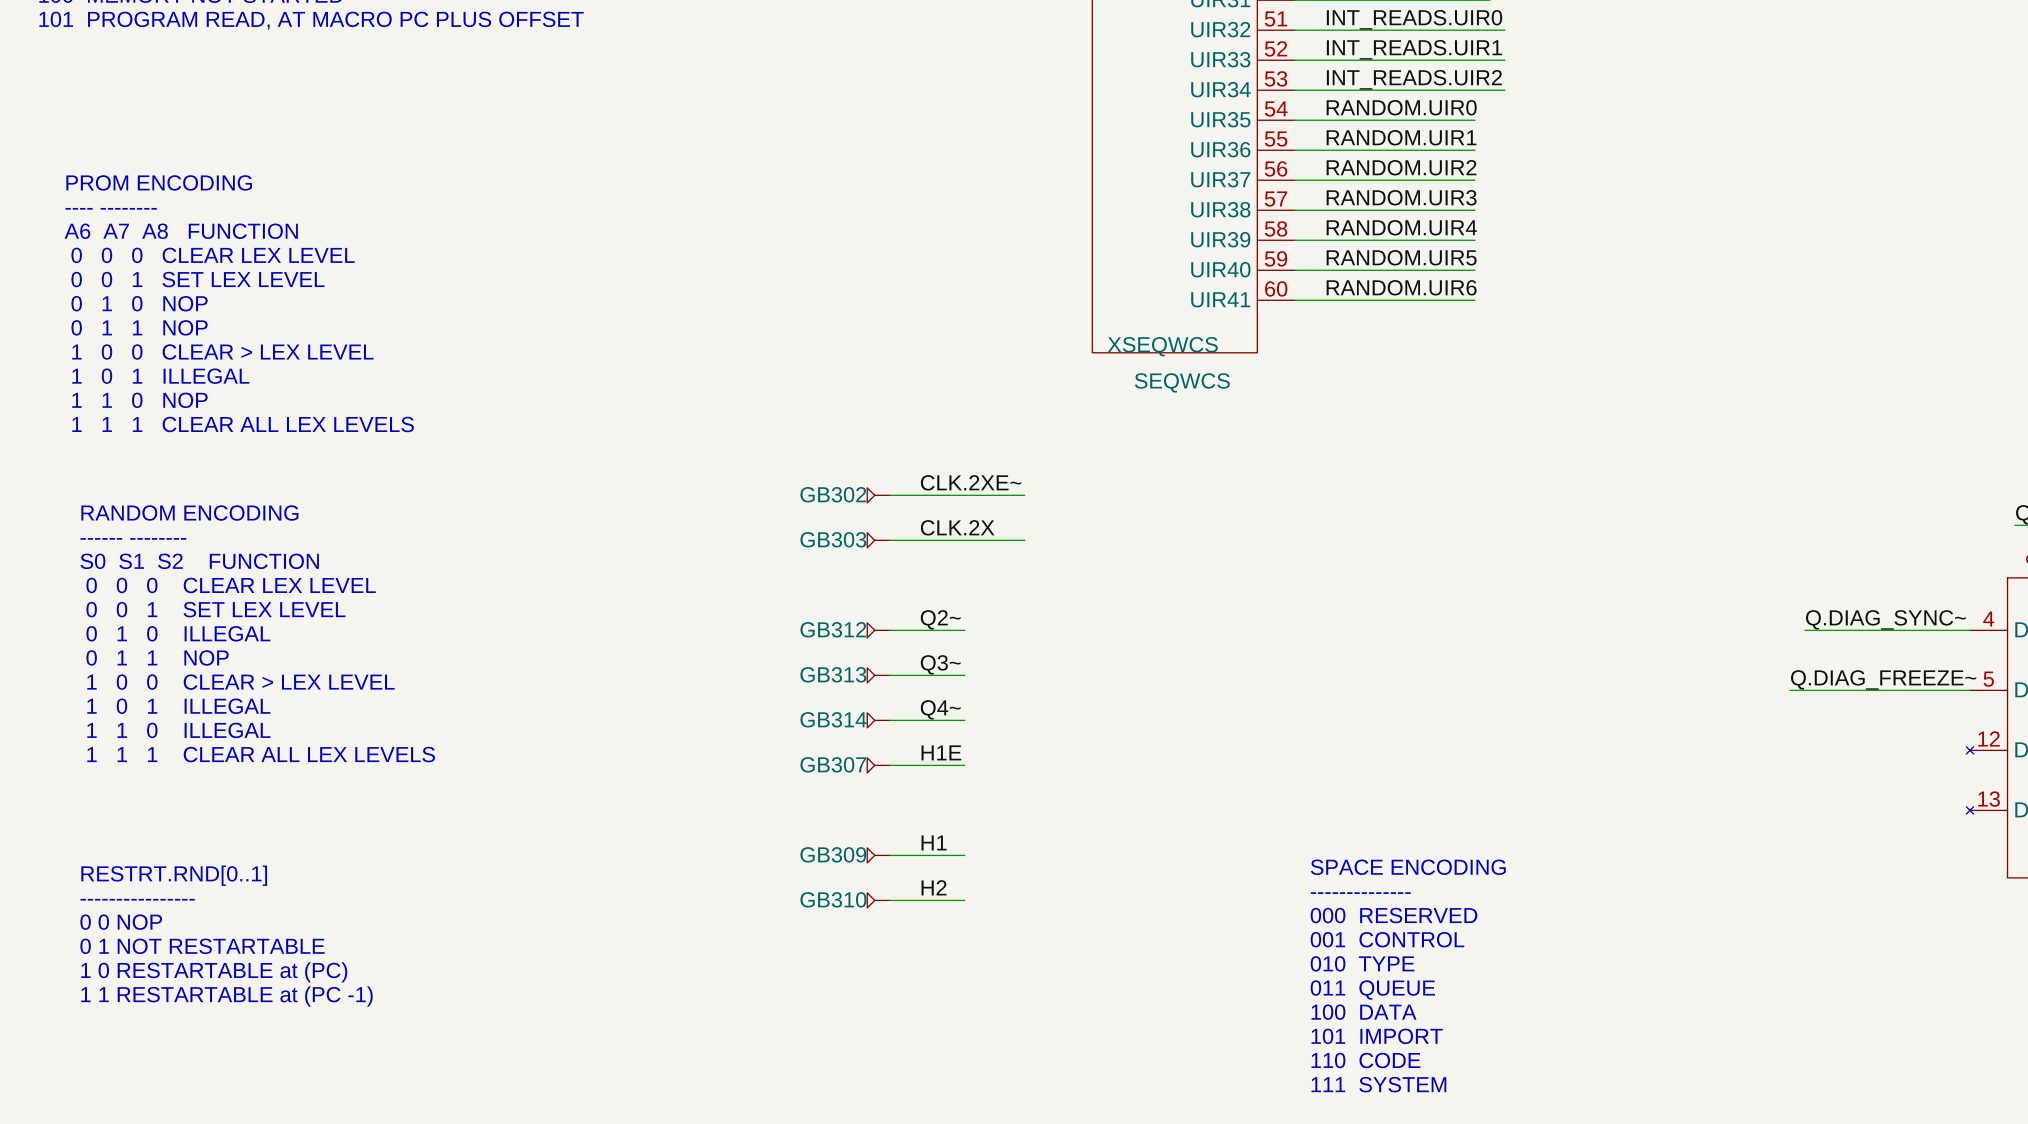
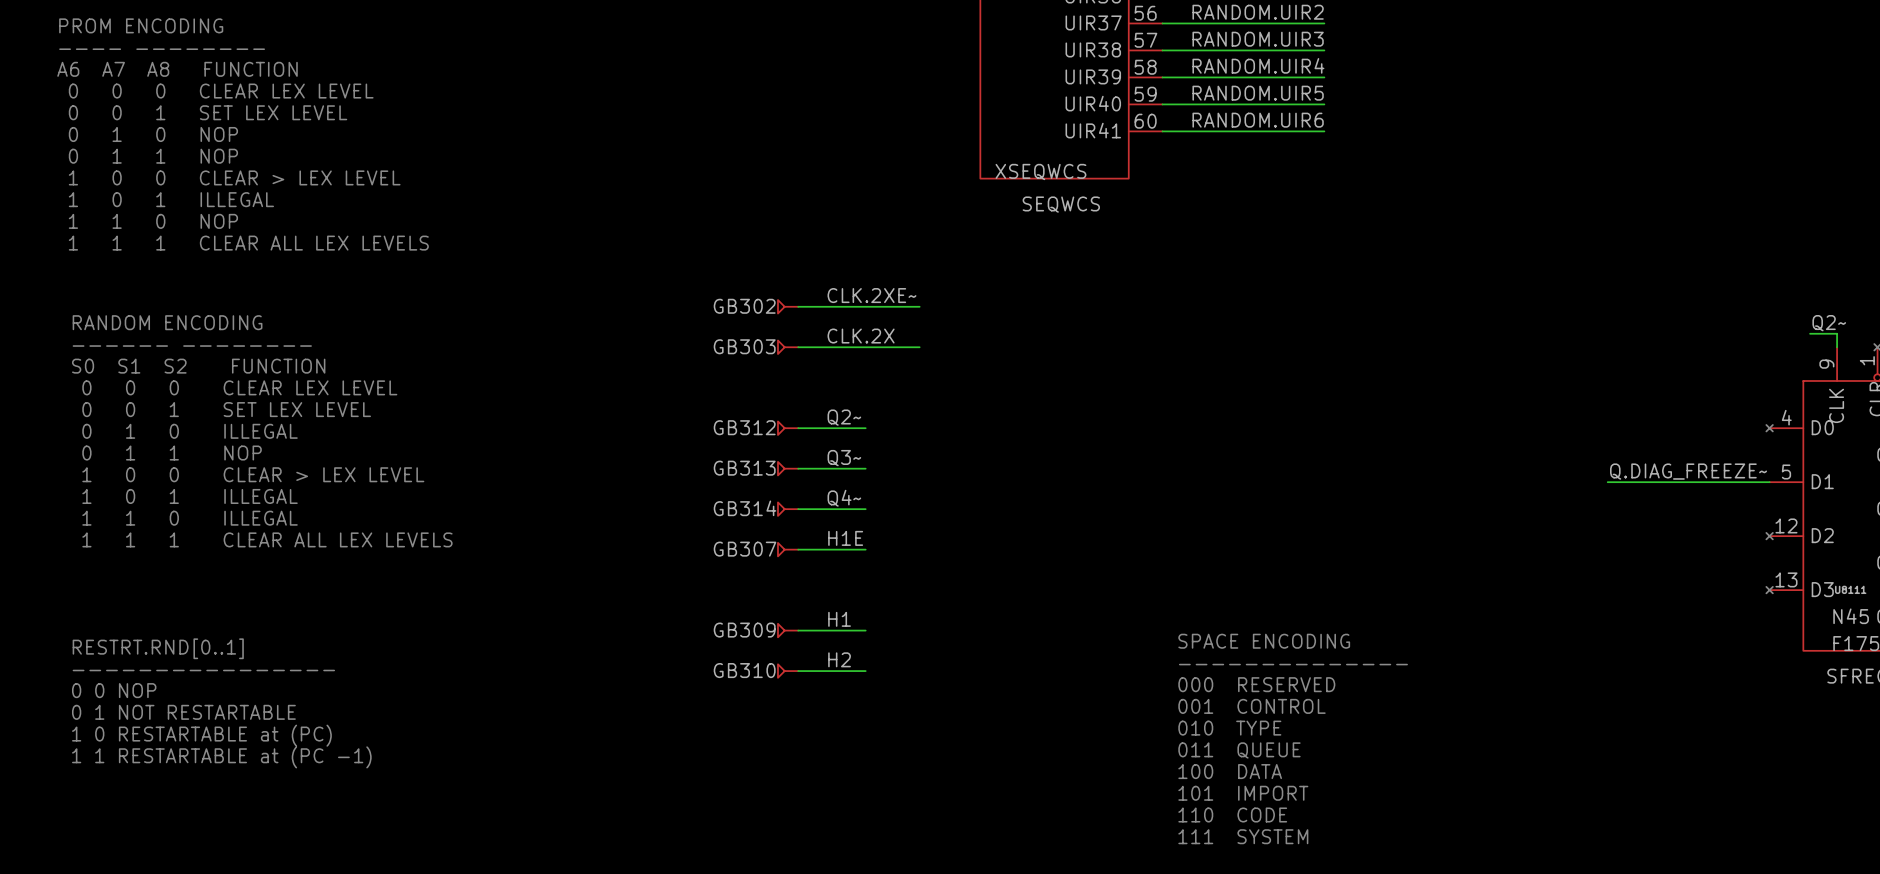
label: Q.DIAG_SYNC~ (1885, 619) -> none
wire: (1804, 630) (1970, 630) -> none
no-connect mark: none -> (1769, 428)

